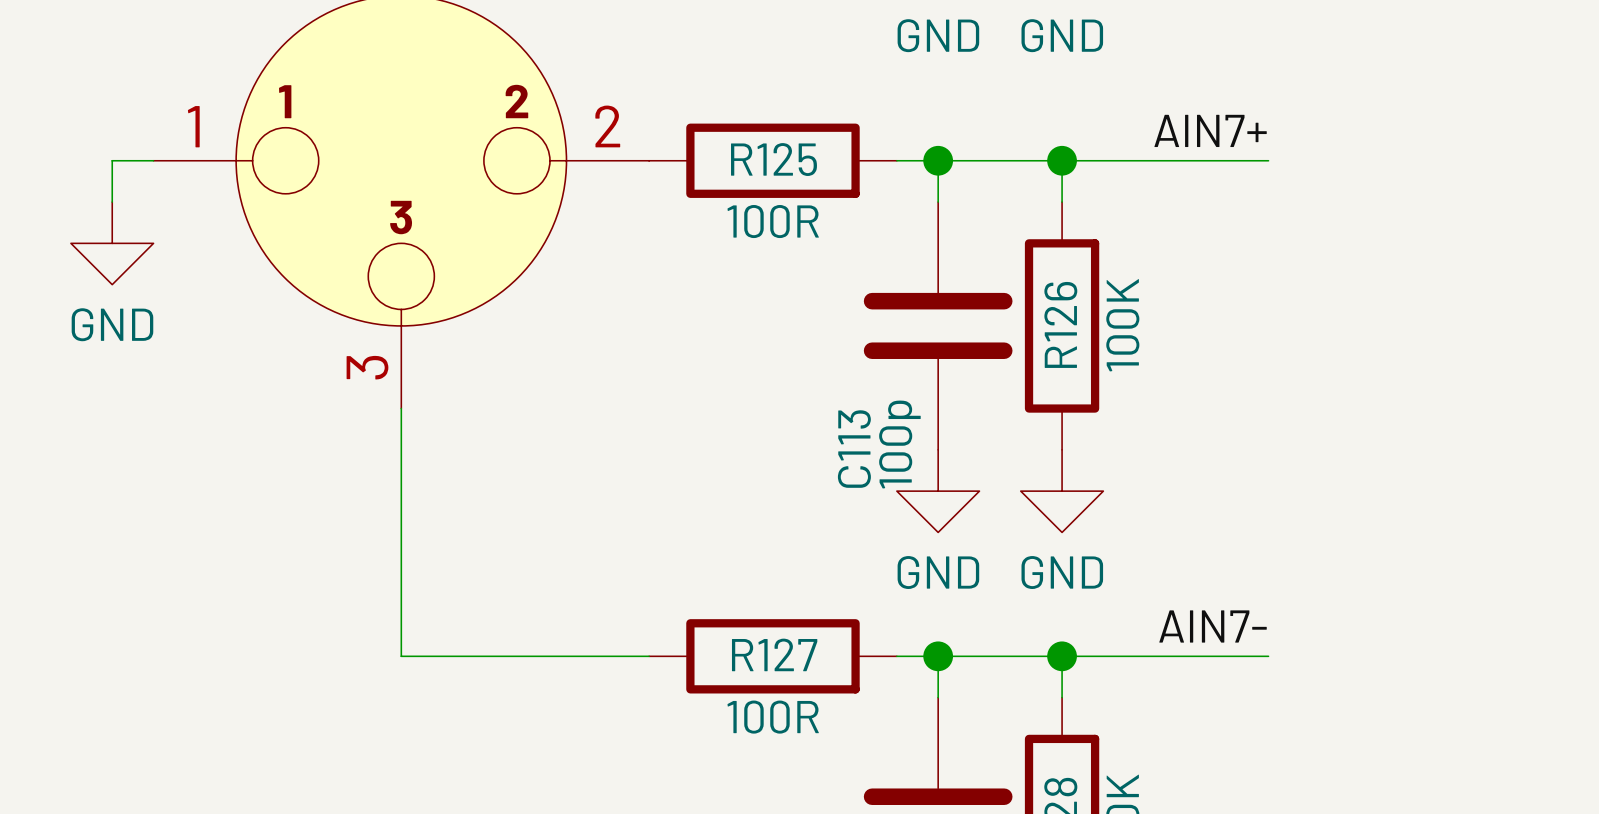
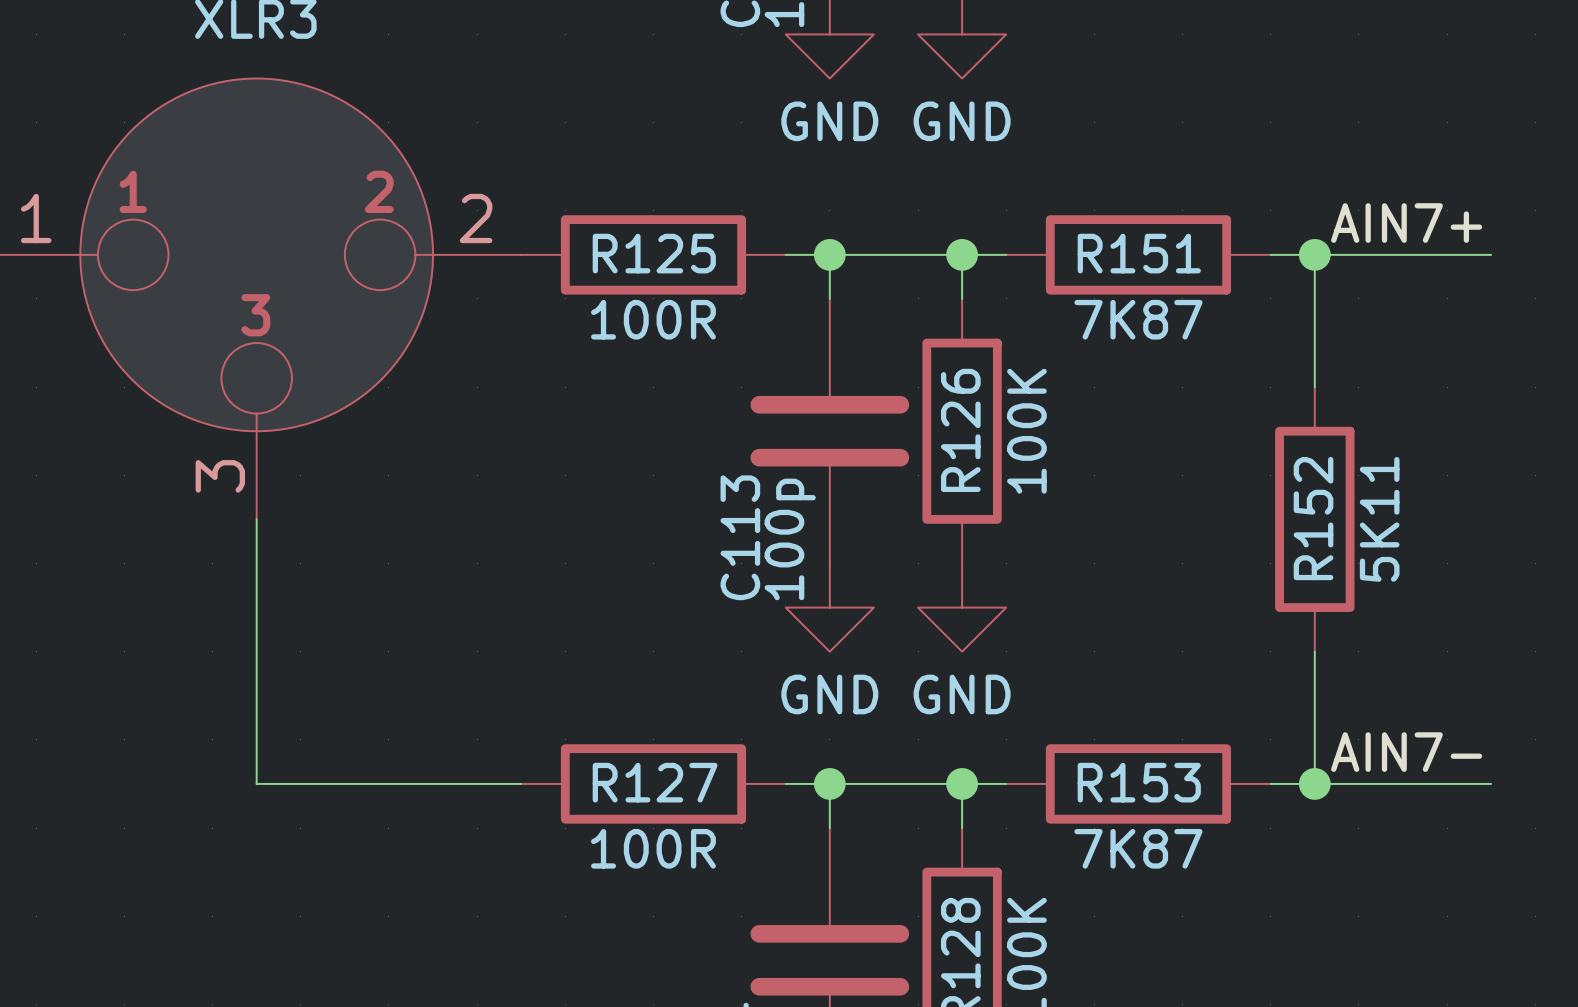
label position: AIN7+ (1210, 130) -> AIN7+ (1406, 223)
wire: (1103, 160) (1268, 160) -> none
R151: none -> (1138, 254)
wire: none -> (1270, 254) (1491, 254)
wire: none -> (1314, 254) (1314, 387)
junction: none -> (1314, 254)
R152: none -> (1314, 519)
wire: none -> (1314, 651) (1314, 783)
label position: AIN7- (1212, 626) -> AIN7- (1406, 752)
wire: (1103, 656) (1268, 656) -> none
R153: none -> (1138, 783)
wire: none -> (1270, 783) (1491, 783)
junction: none -> (1314, 783)

